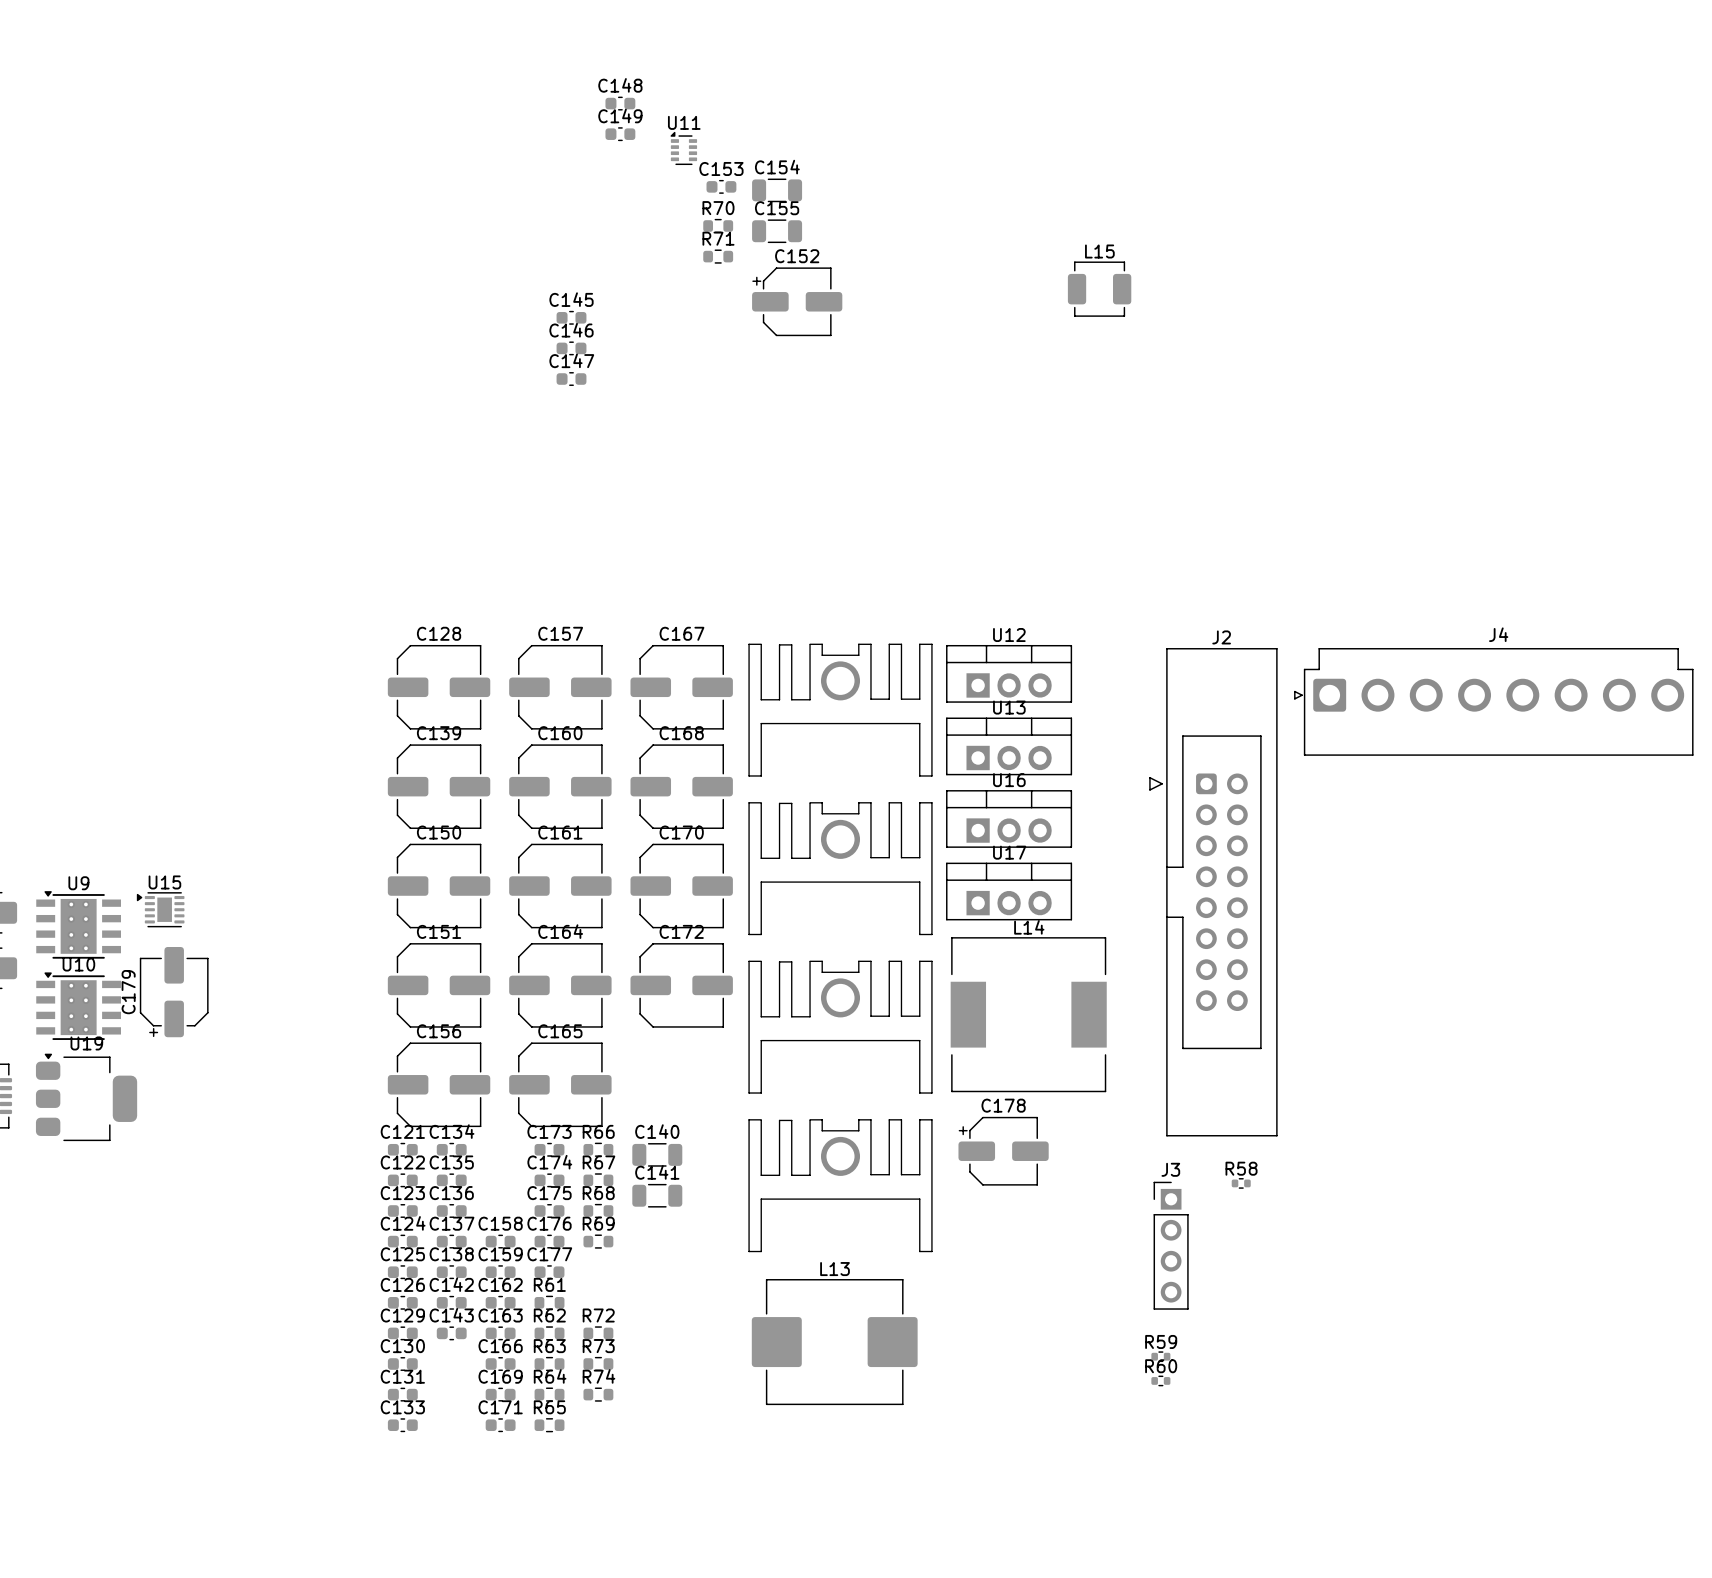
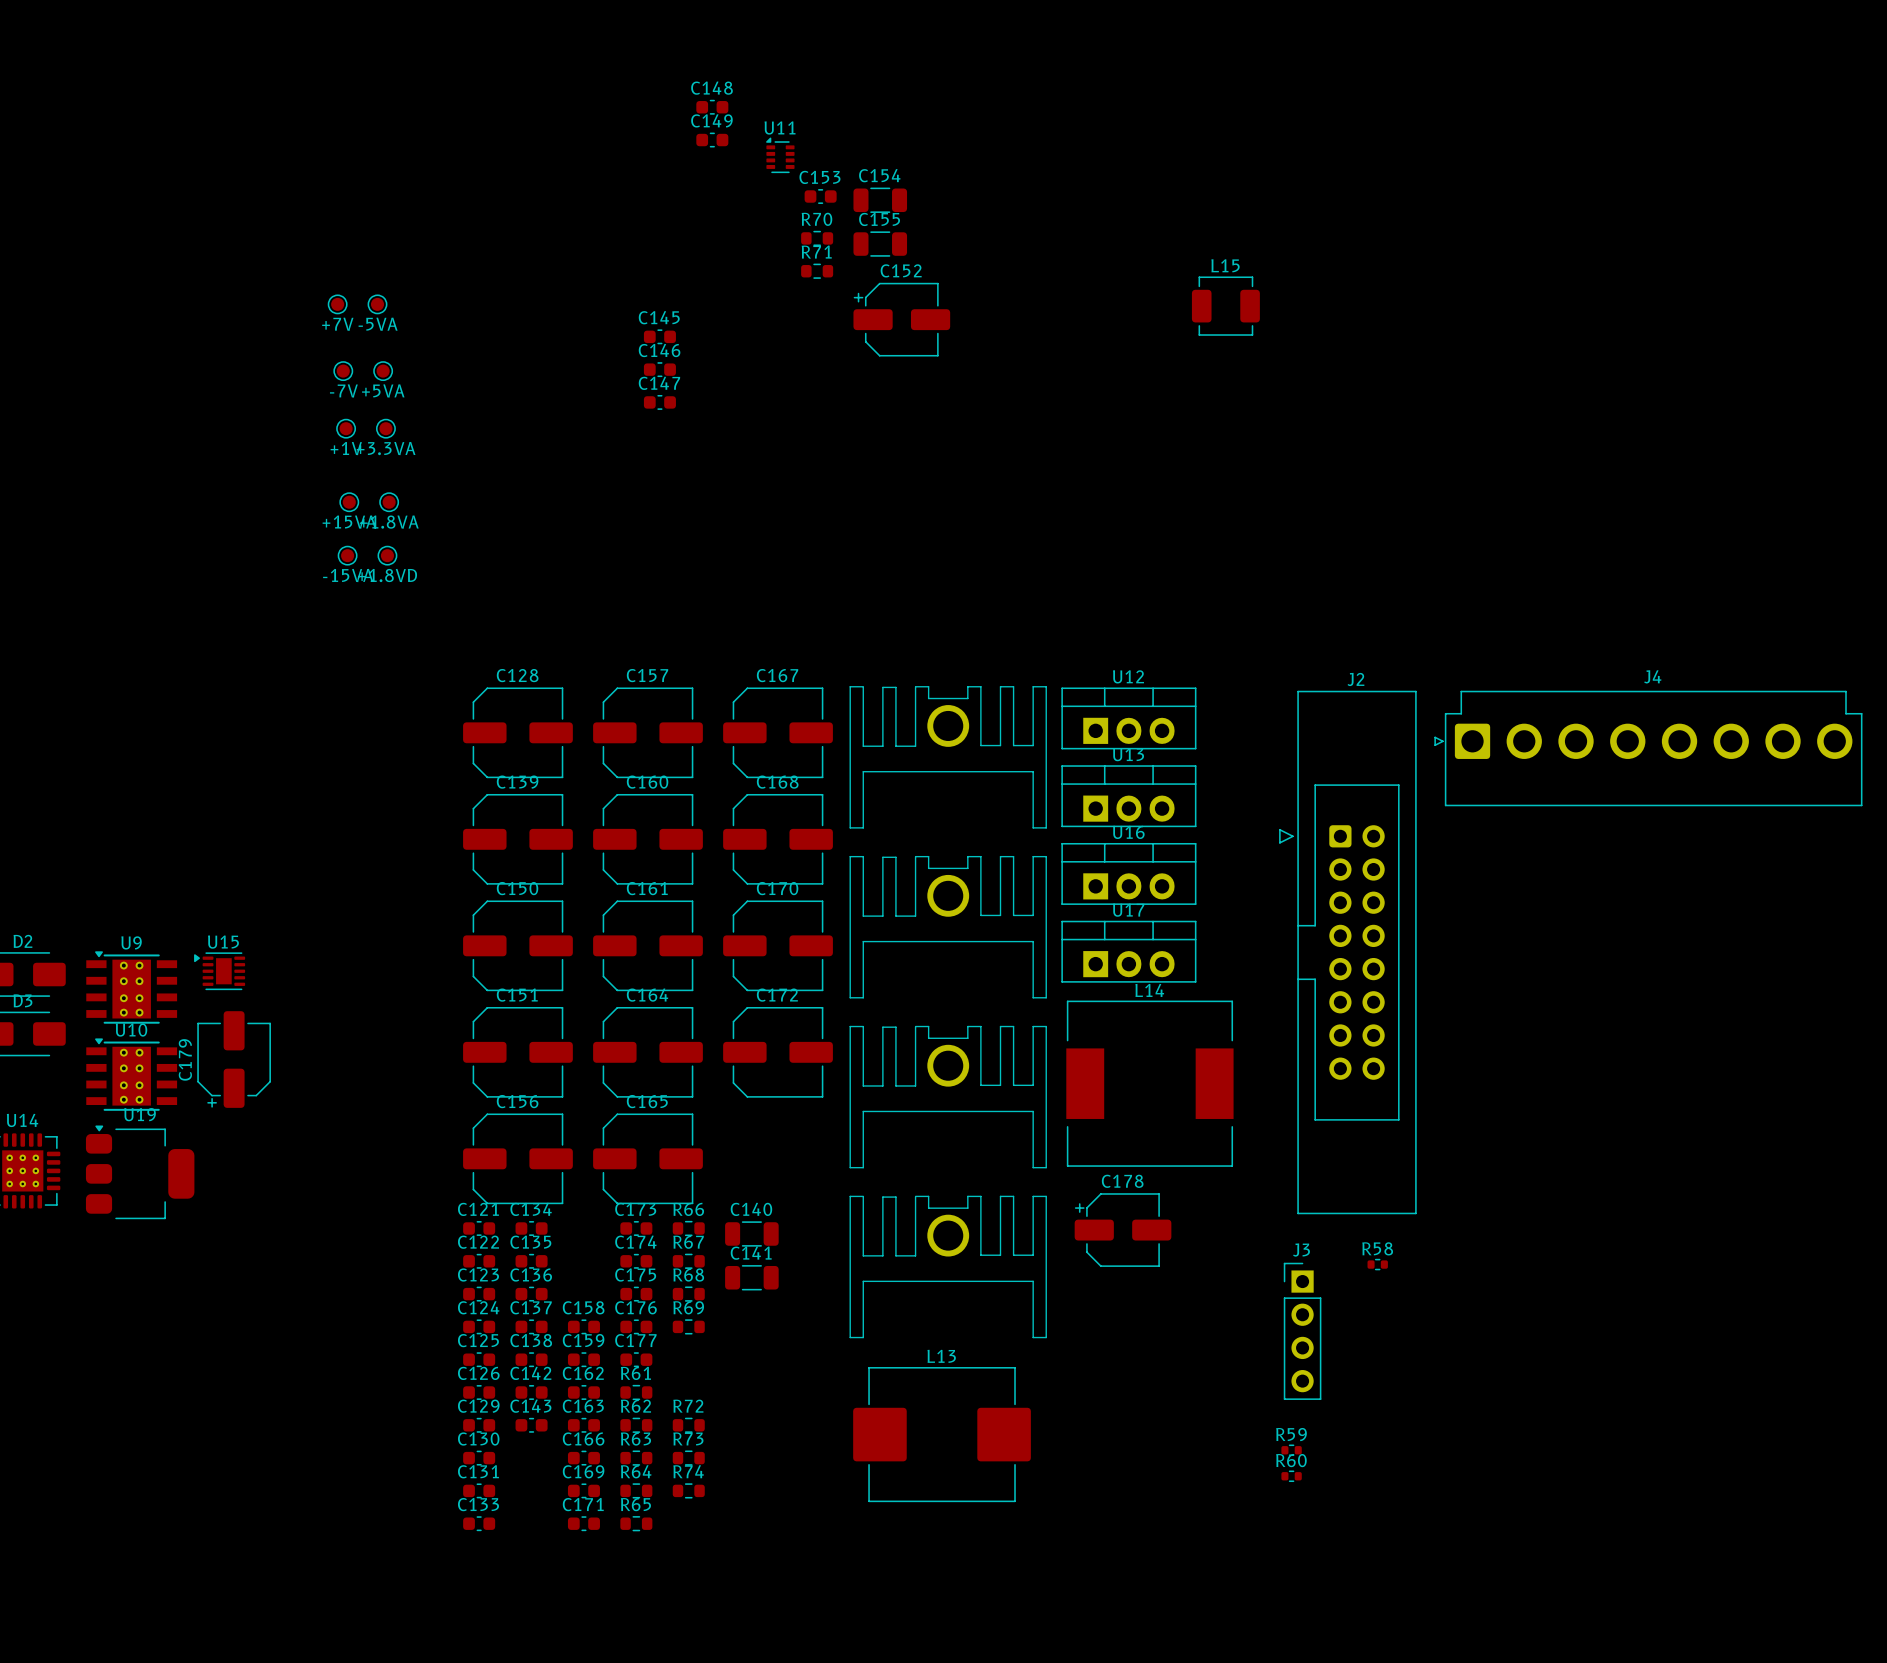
part: none -> +7V (337, 304)
part: none -> -5VA (377, 304)
part: none -> -7V (343, 371)
part: none -> +5VA (383, 371)
part: none -> +1V (346, 428)
part: none -> +3.3VA (385, 428)
part: none -> +15VA (349, 502)
part: none -> +1.8VA (389, 502)
part: none -> -15VA (347, 555)
part: none -> +1.8VD (387, 555)

